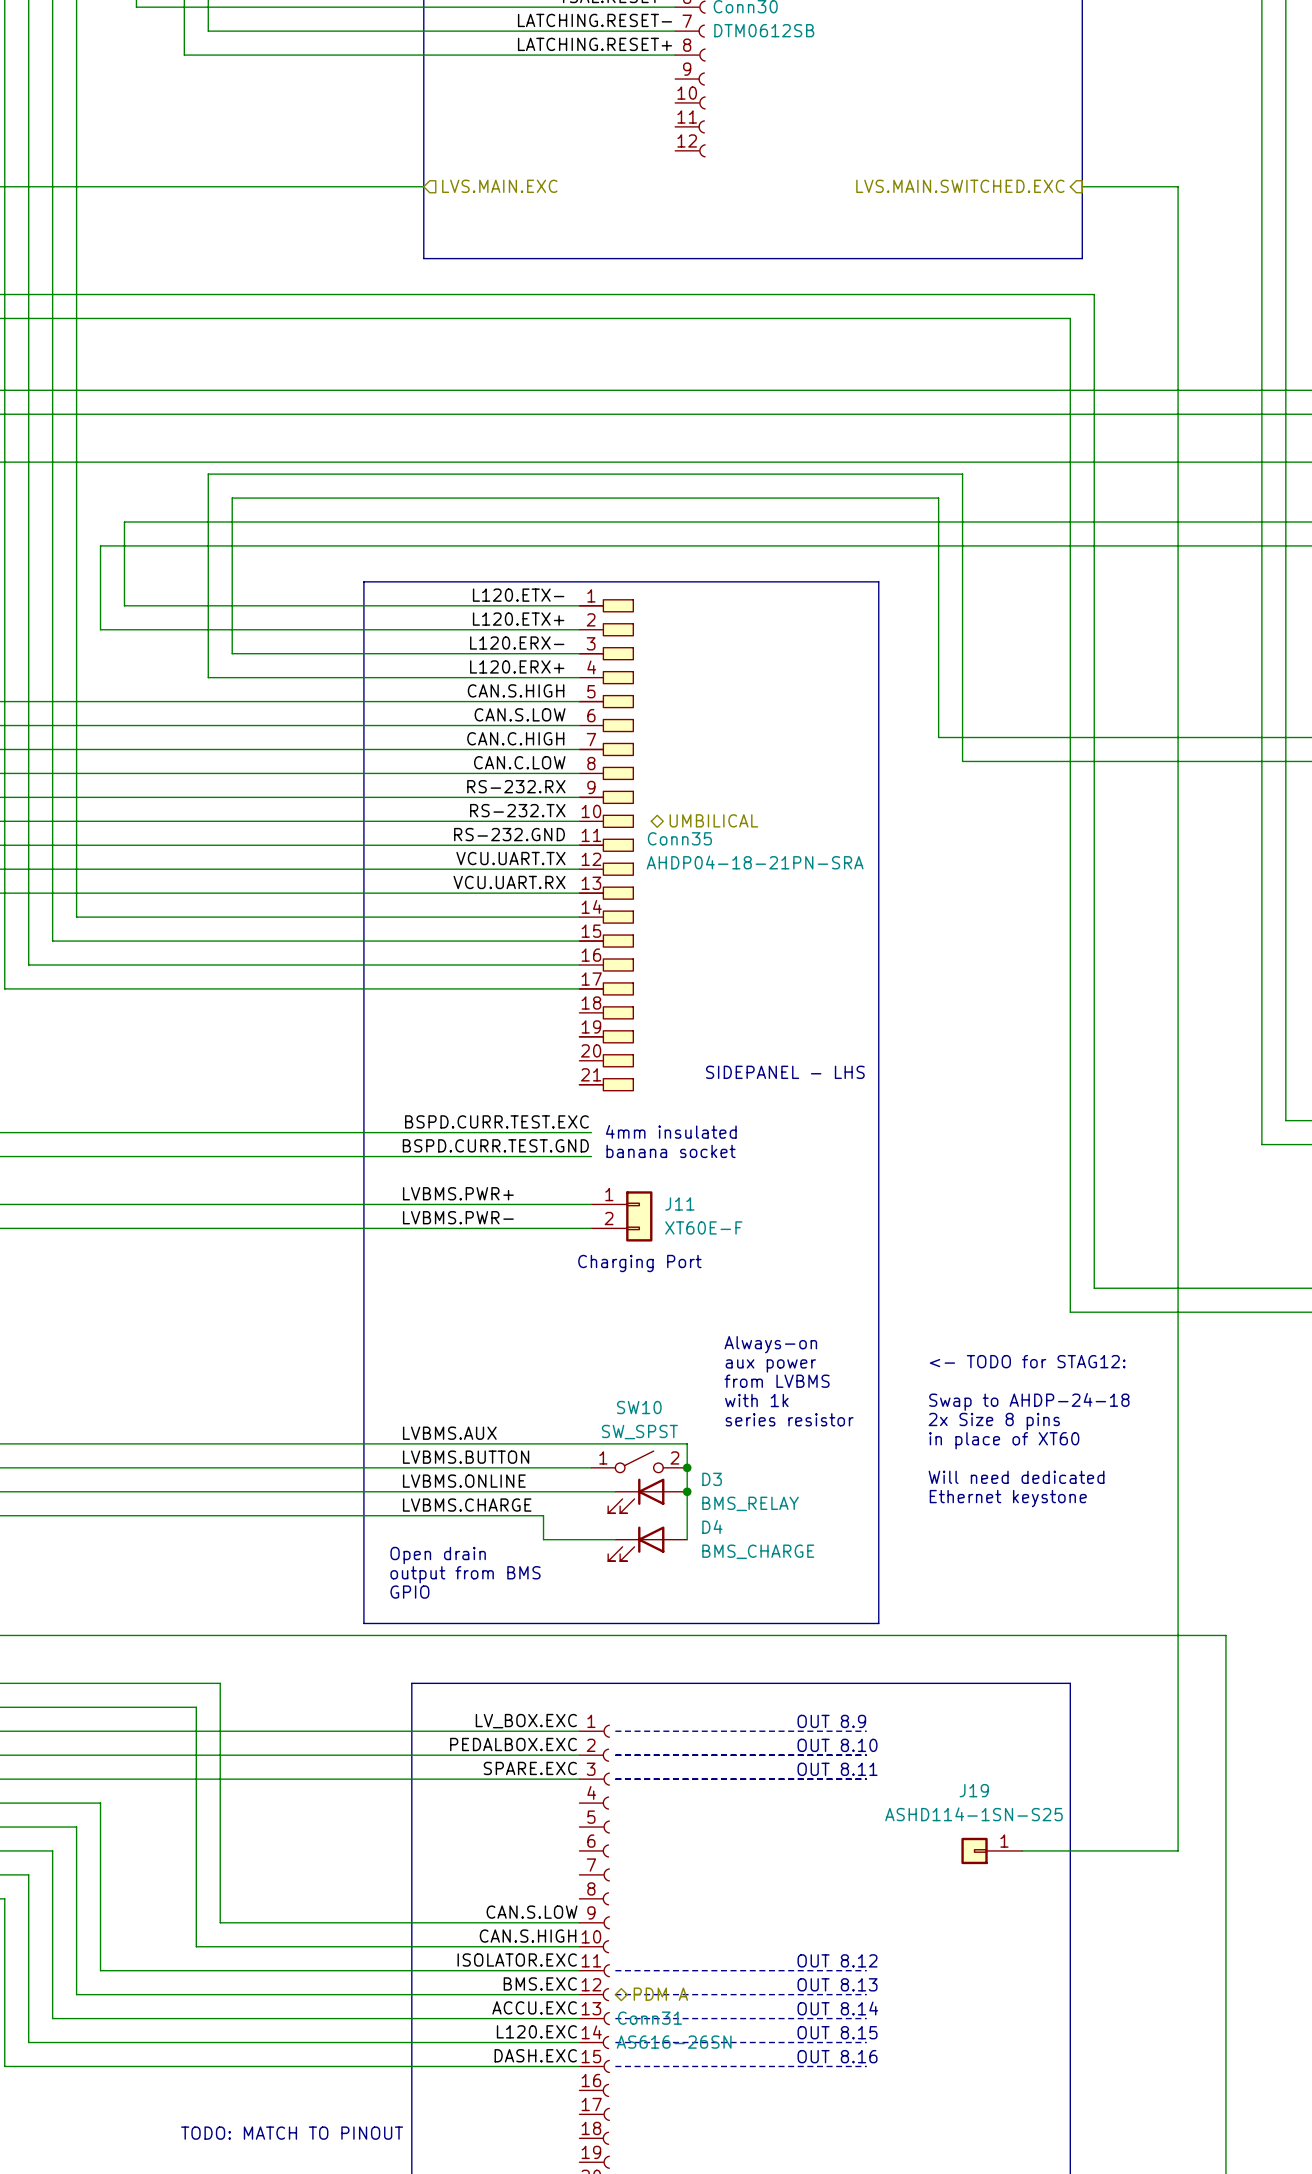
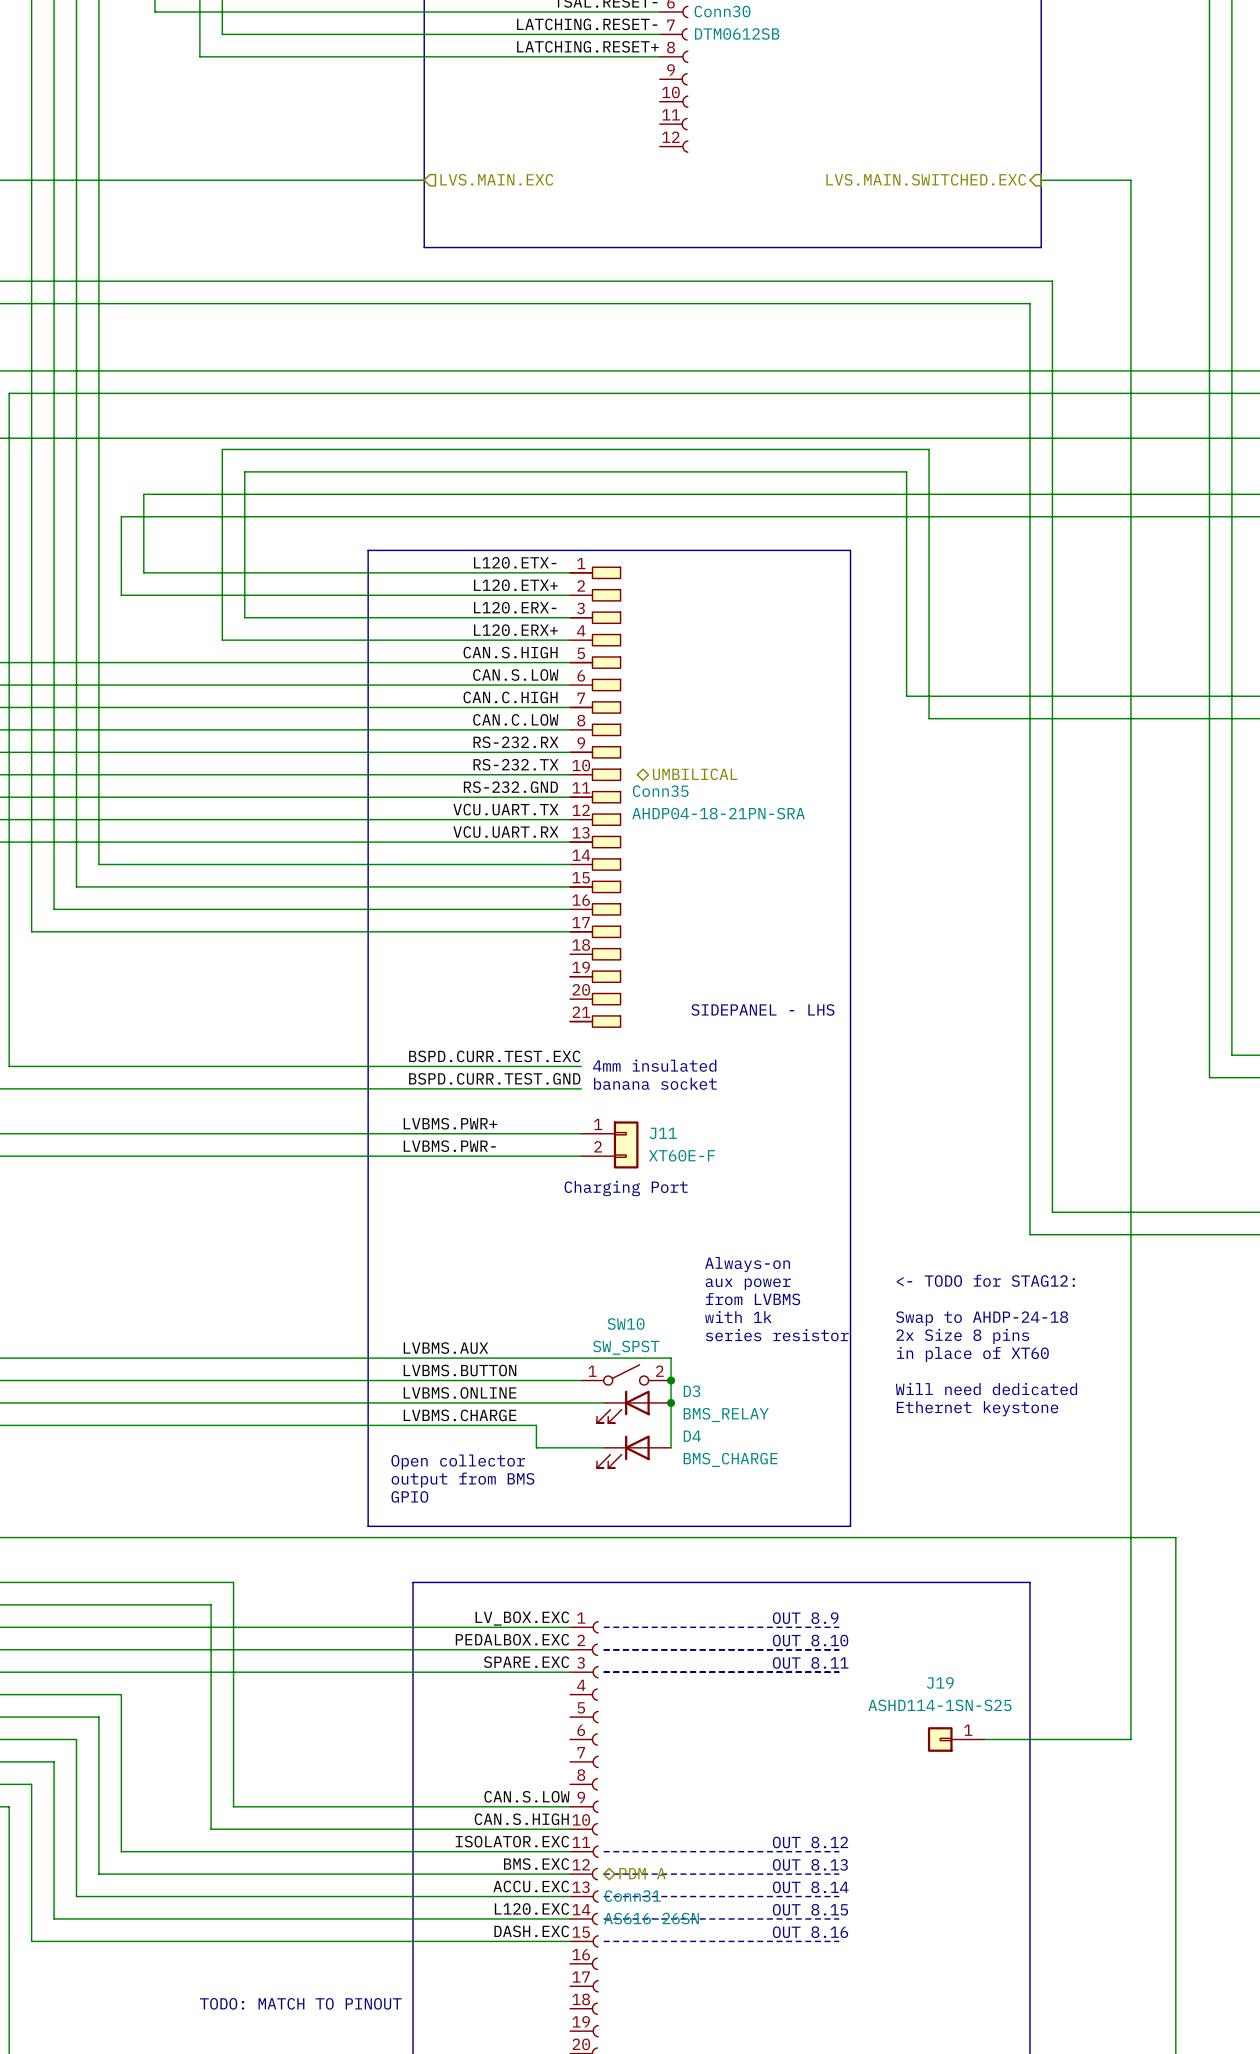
text: Open drain (438, 1555) -> Open collector (458, 1462)

